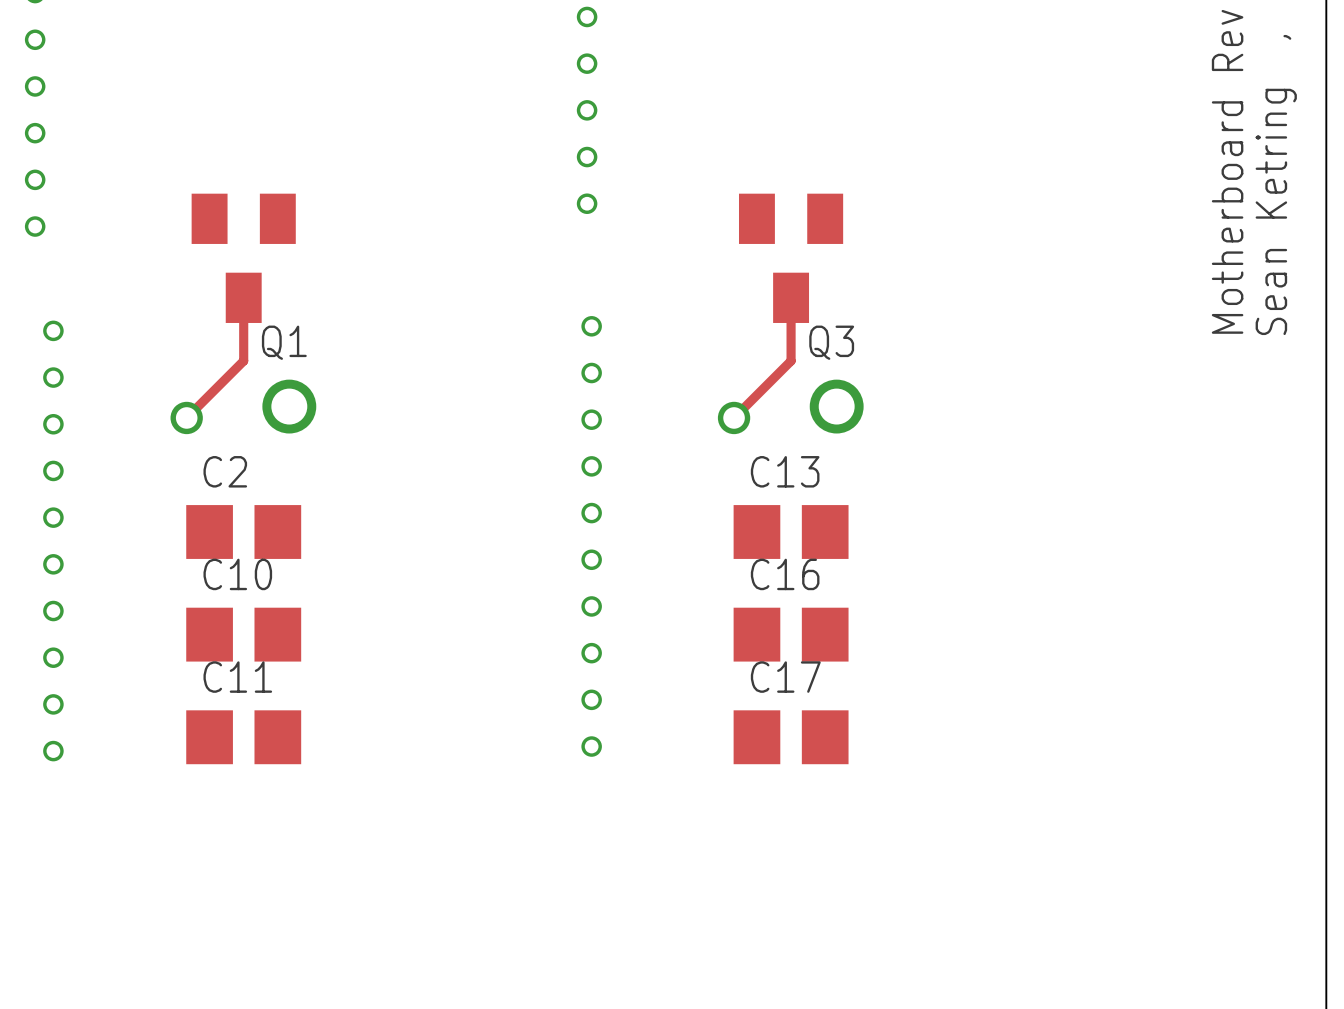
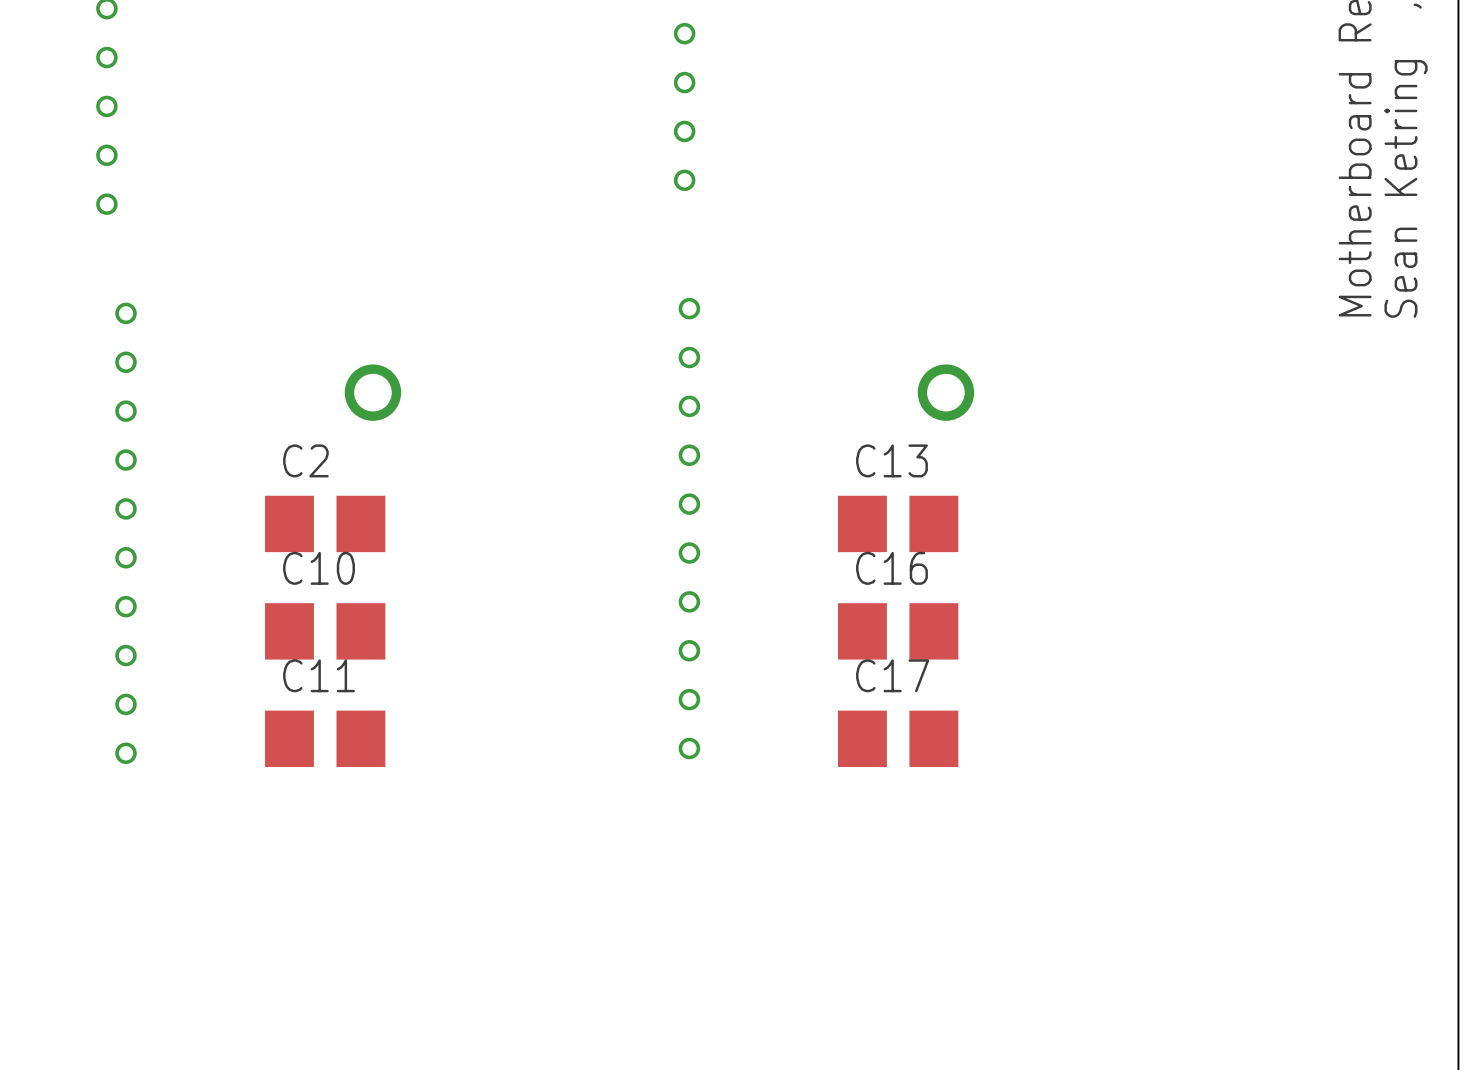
Q1: (243, 258) -> none
Q3: (791, 258) -> none
track: (243, 297) (243, 360) (186, 417) -> none
track: (791, 297) (791, 360) (734, 417) -> none
via: (186, 417) -> none
via: (734, 417) -> none

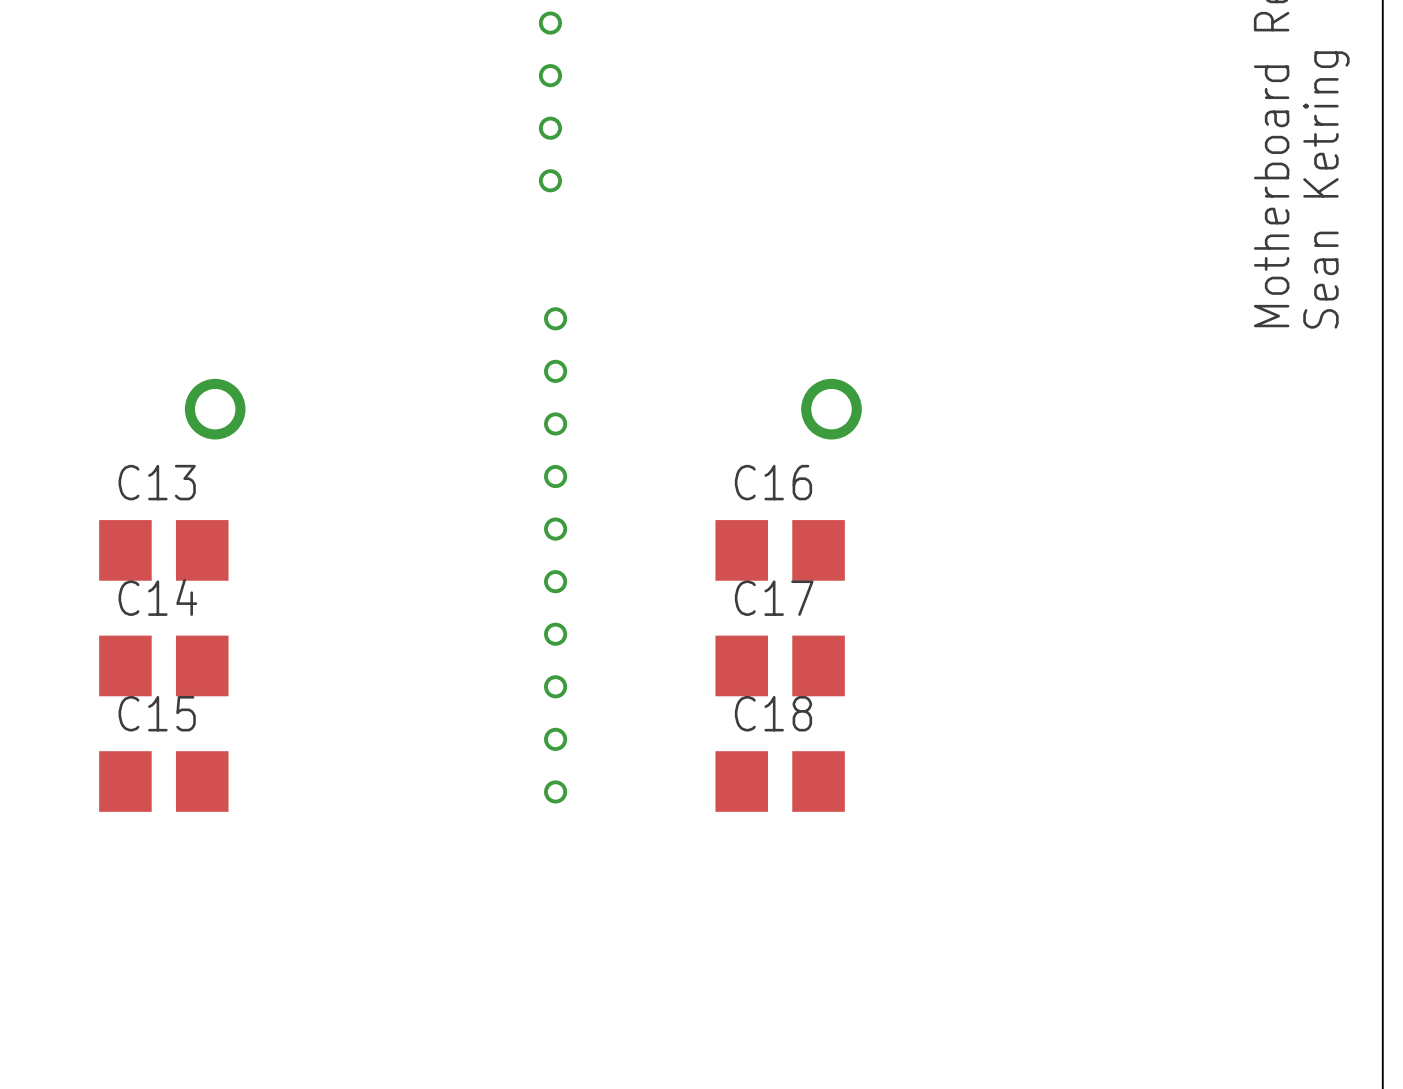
C2 name: C2 (305, 460) -> C13 (157, 482)
C13 name: C13 (891, 460) -> C16 (773, 482)
C10 name: C10 (319, 568) -> C14 (157, 597)
C16 name: C16 (891, 568) -> C17 (774, 598)
C11 name: C11 (319, 675) -> C15 (157, 713)
C17 name: C17 (892, 675) -> C18 (773, 713)

